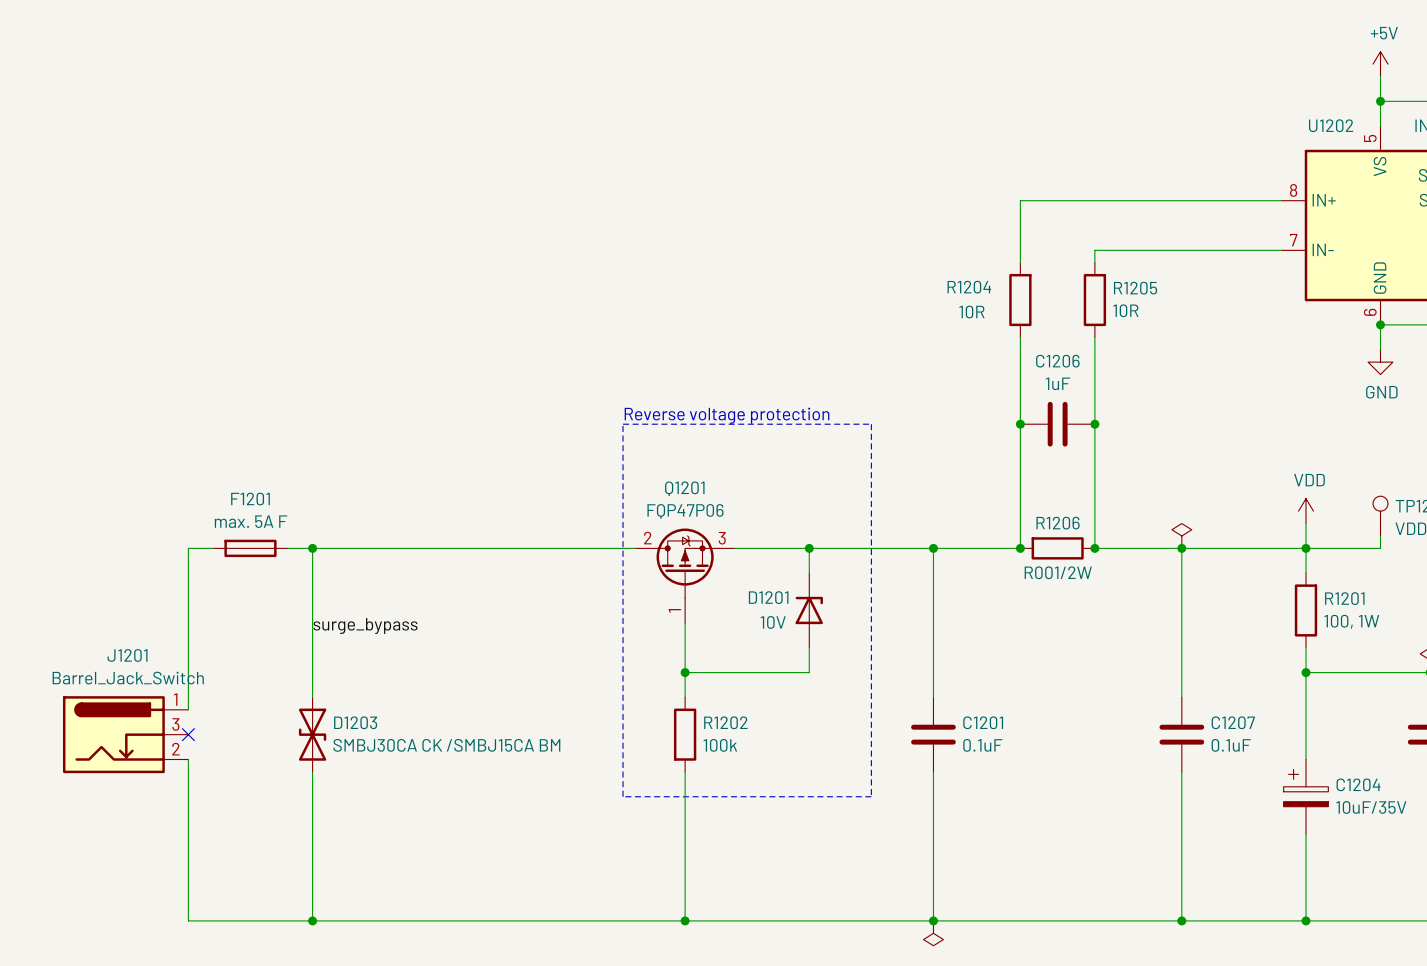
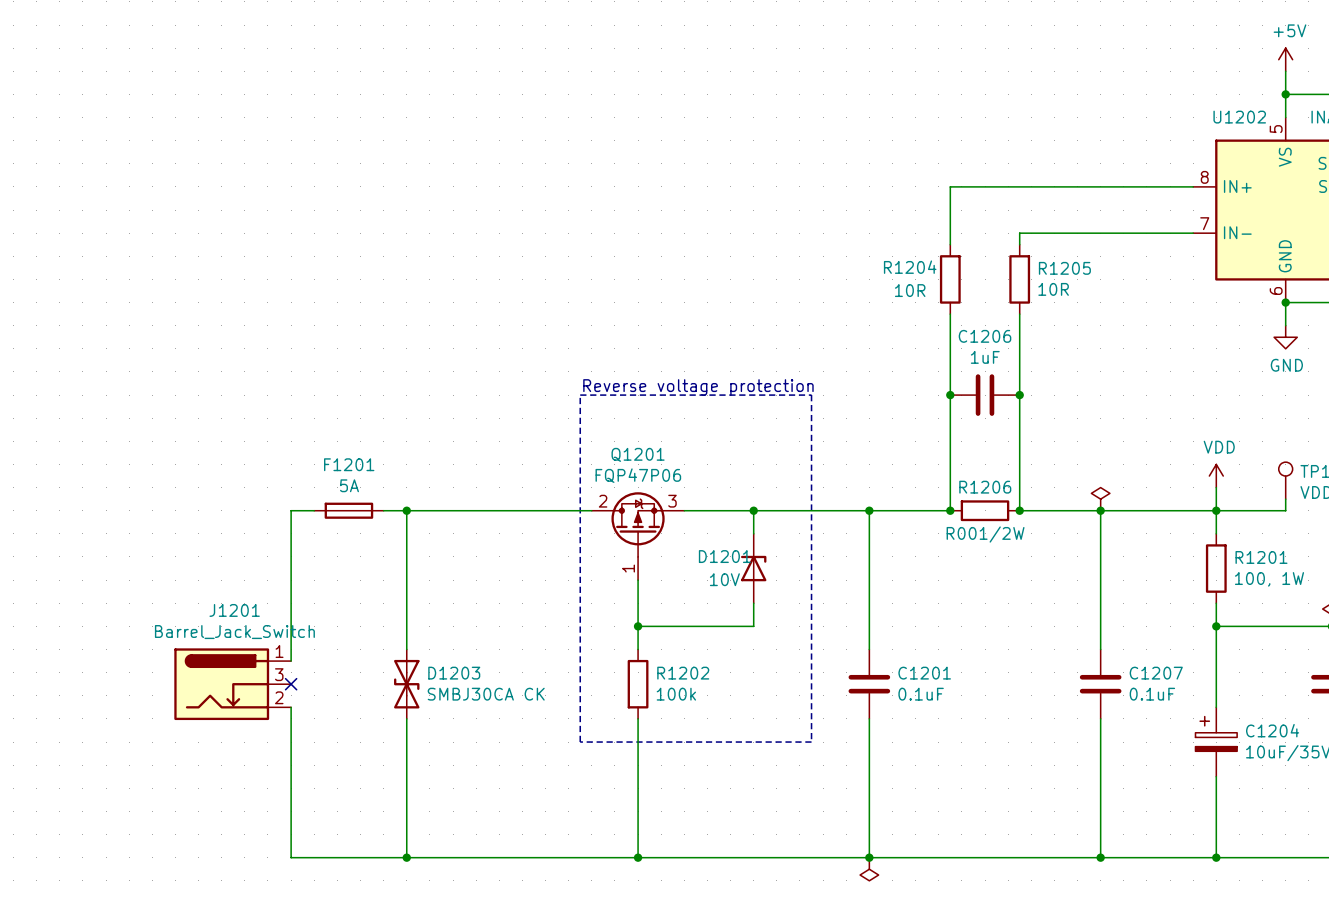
F1201 value: max. 5A F (251, 521) -> 5A (349, 485)
wire: (213, 548) (188, 548) (188, 709) -> none
F1201 position: (250, 548) -> (348, 510)
wire: (287, 548) (312, 548) -> none
junction: (312, 548) -> none
wire: none -> (406, 510) (406, 649)
junction: none -> (406, 510)
label: surge_bypass (365, 626) -> none
J1201 position: (125, 734) -> (232, 684)
no-connect mark: (188, 734) -> none
D1203 position: (312, 734) -> (406, 684)
no-connect mark: none -> (291, 684)
D1203 value: SMBJ30CA CK /SMBJ15CA BM (446, 745) -> SMBJ30CA CK (486, 694)
wire: (188, 759) (188, 920) (312, 920) -> none
wire: none -> (406, 718) (406, 857)
junction: (312, 920) -> none
junction: none -> (406, 857)

